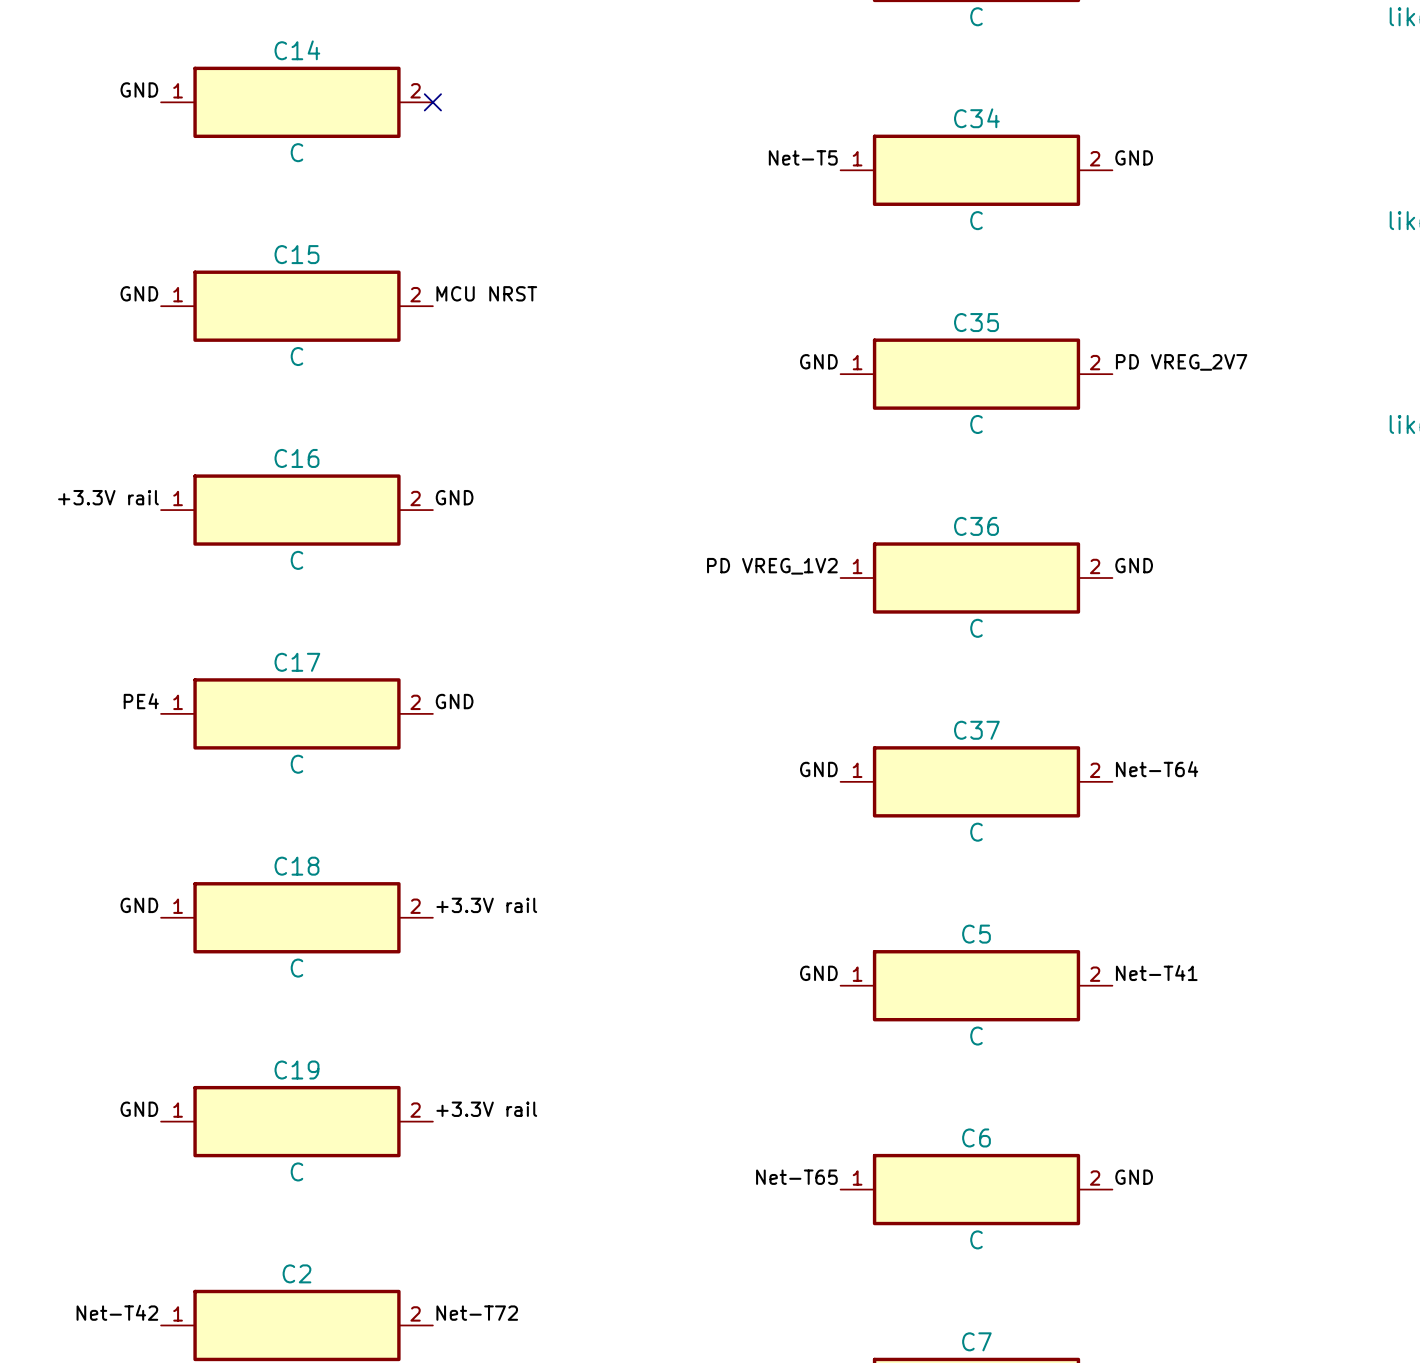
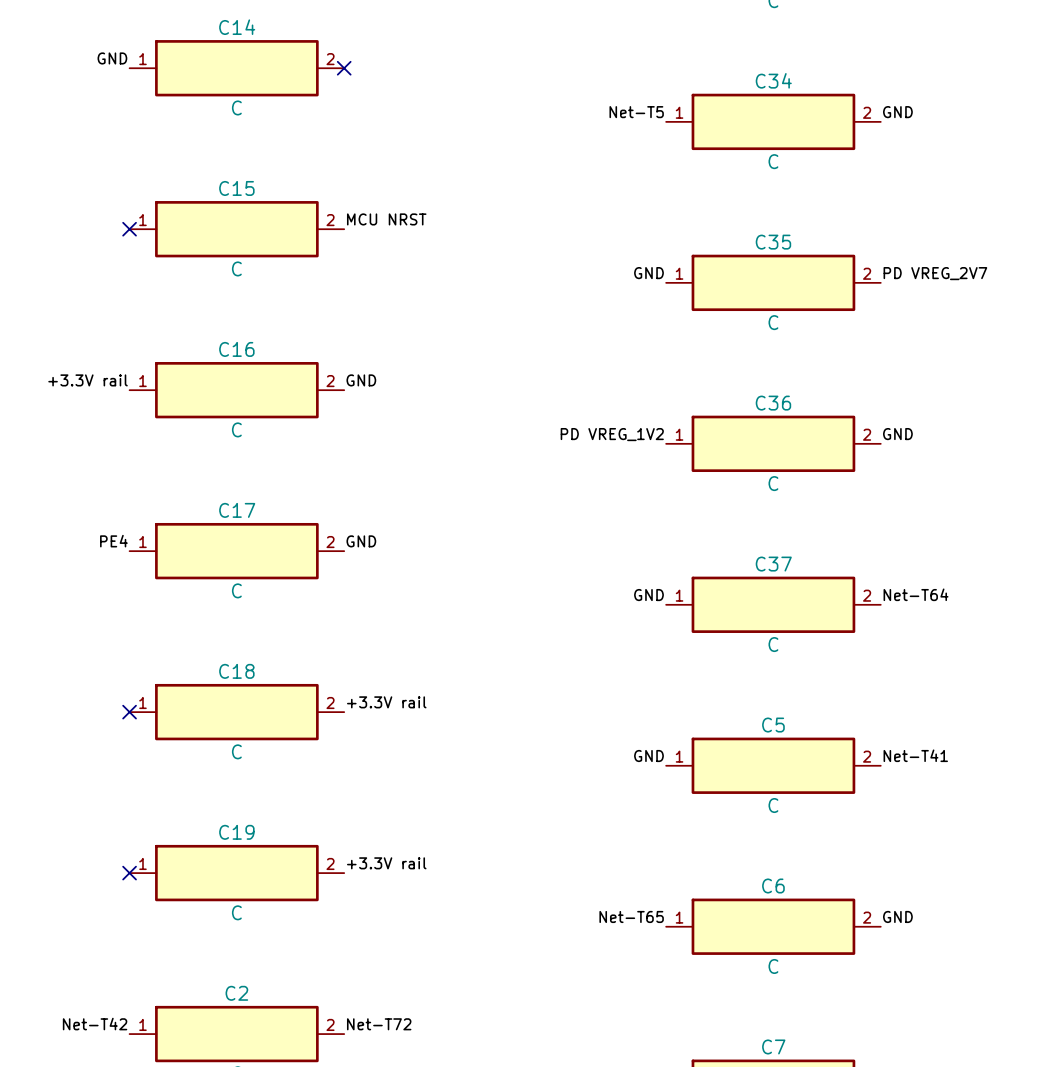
label: GND (139, 293) -> none
no-connect mark: none -> (129, 229)
label: GND (139, 905) -> none
no-connect mark: none -> (129, 712)
label: GND (139, 1109) -> none
no-connect mark: none -> (129, 873)

